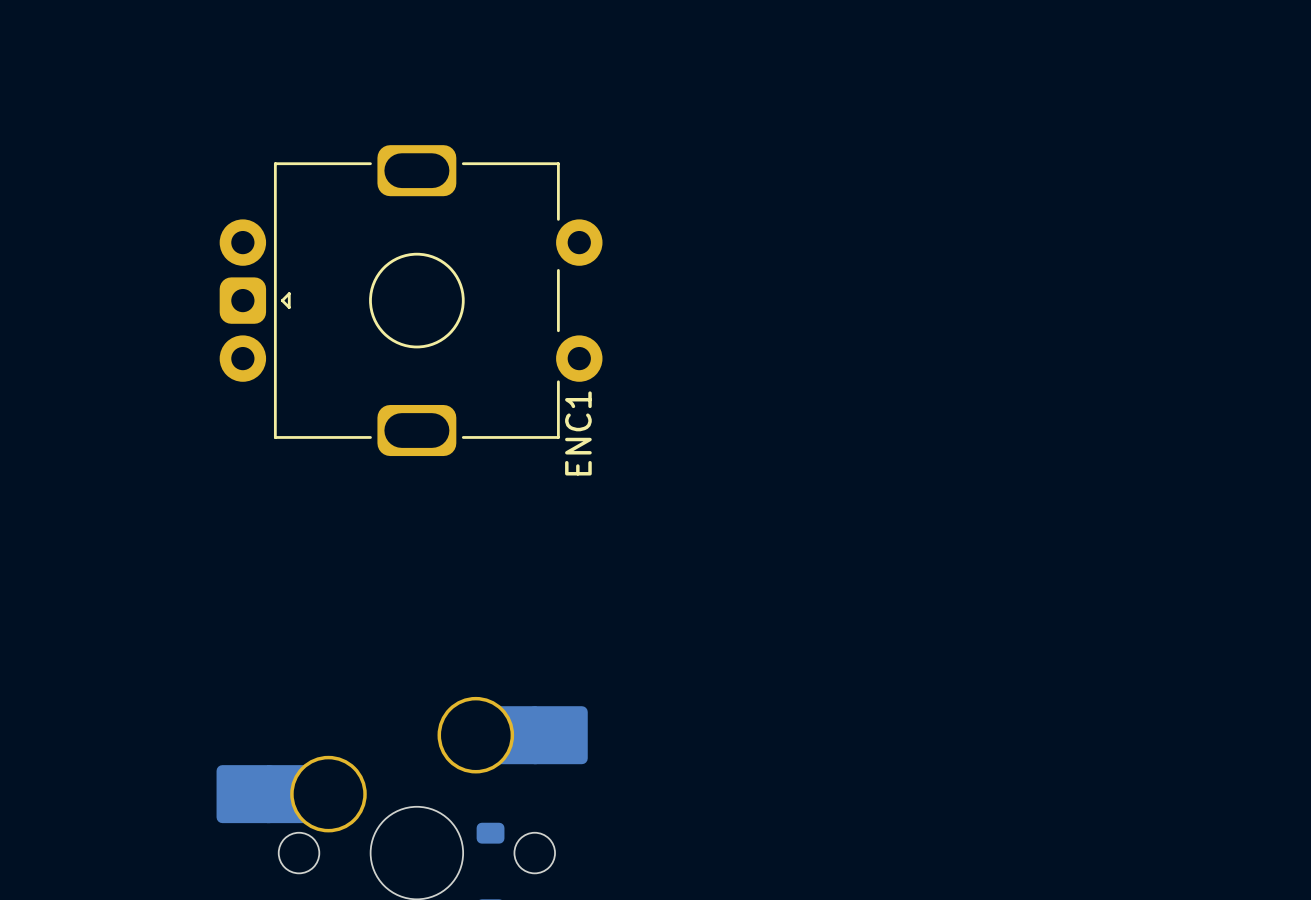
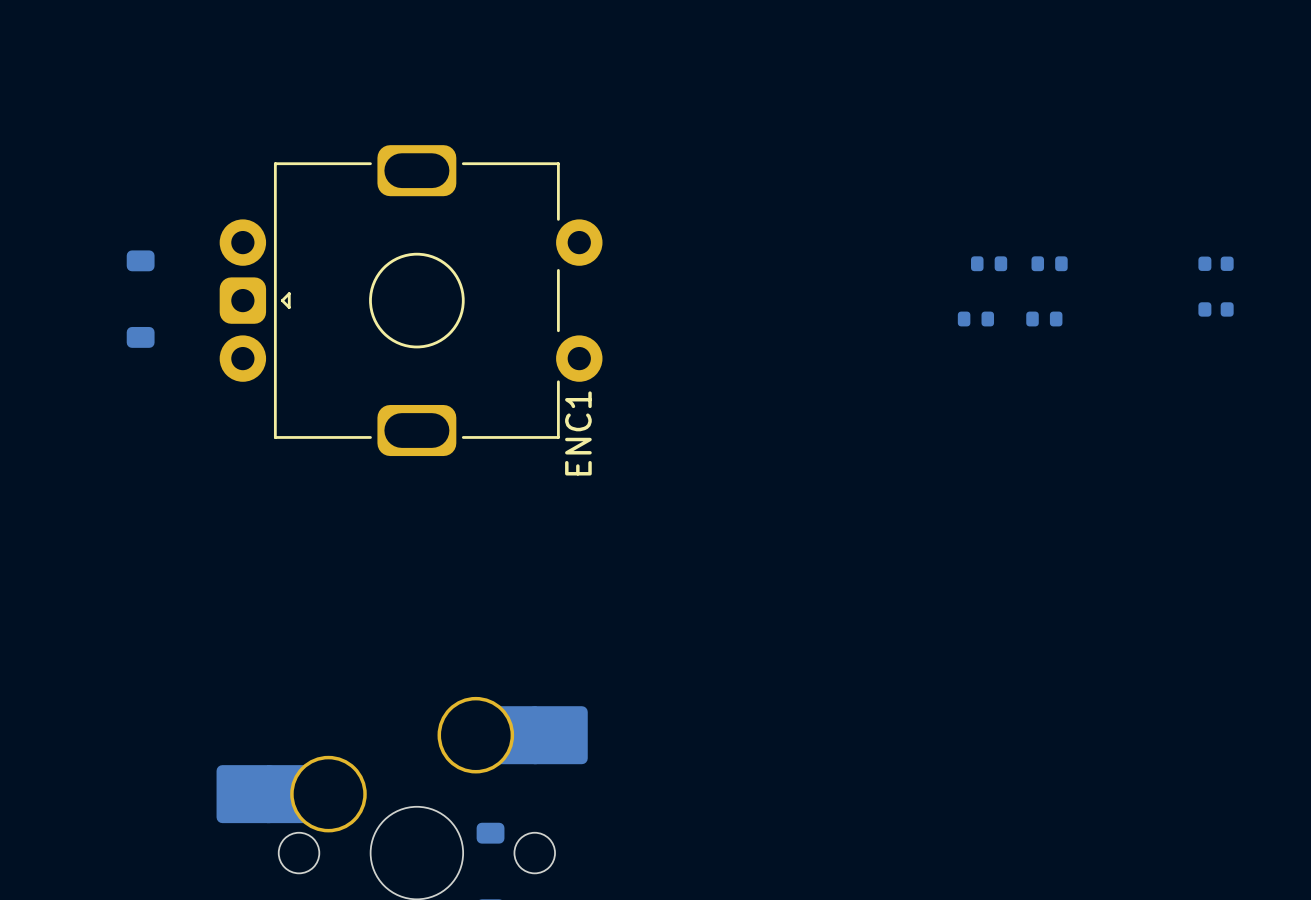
part: none -> (989, 263)
part: none -> (1049, 263)
part: none -> (1216, 263)
part: none -> (140, 299)
part: none -> (1216, 309)
part: none -> (975, 319)
part: none -> (1044, 319)

